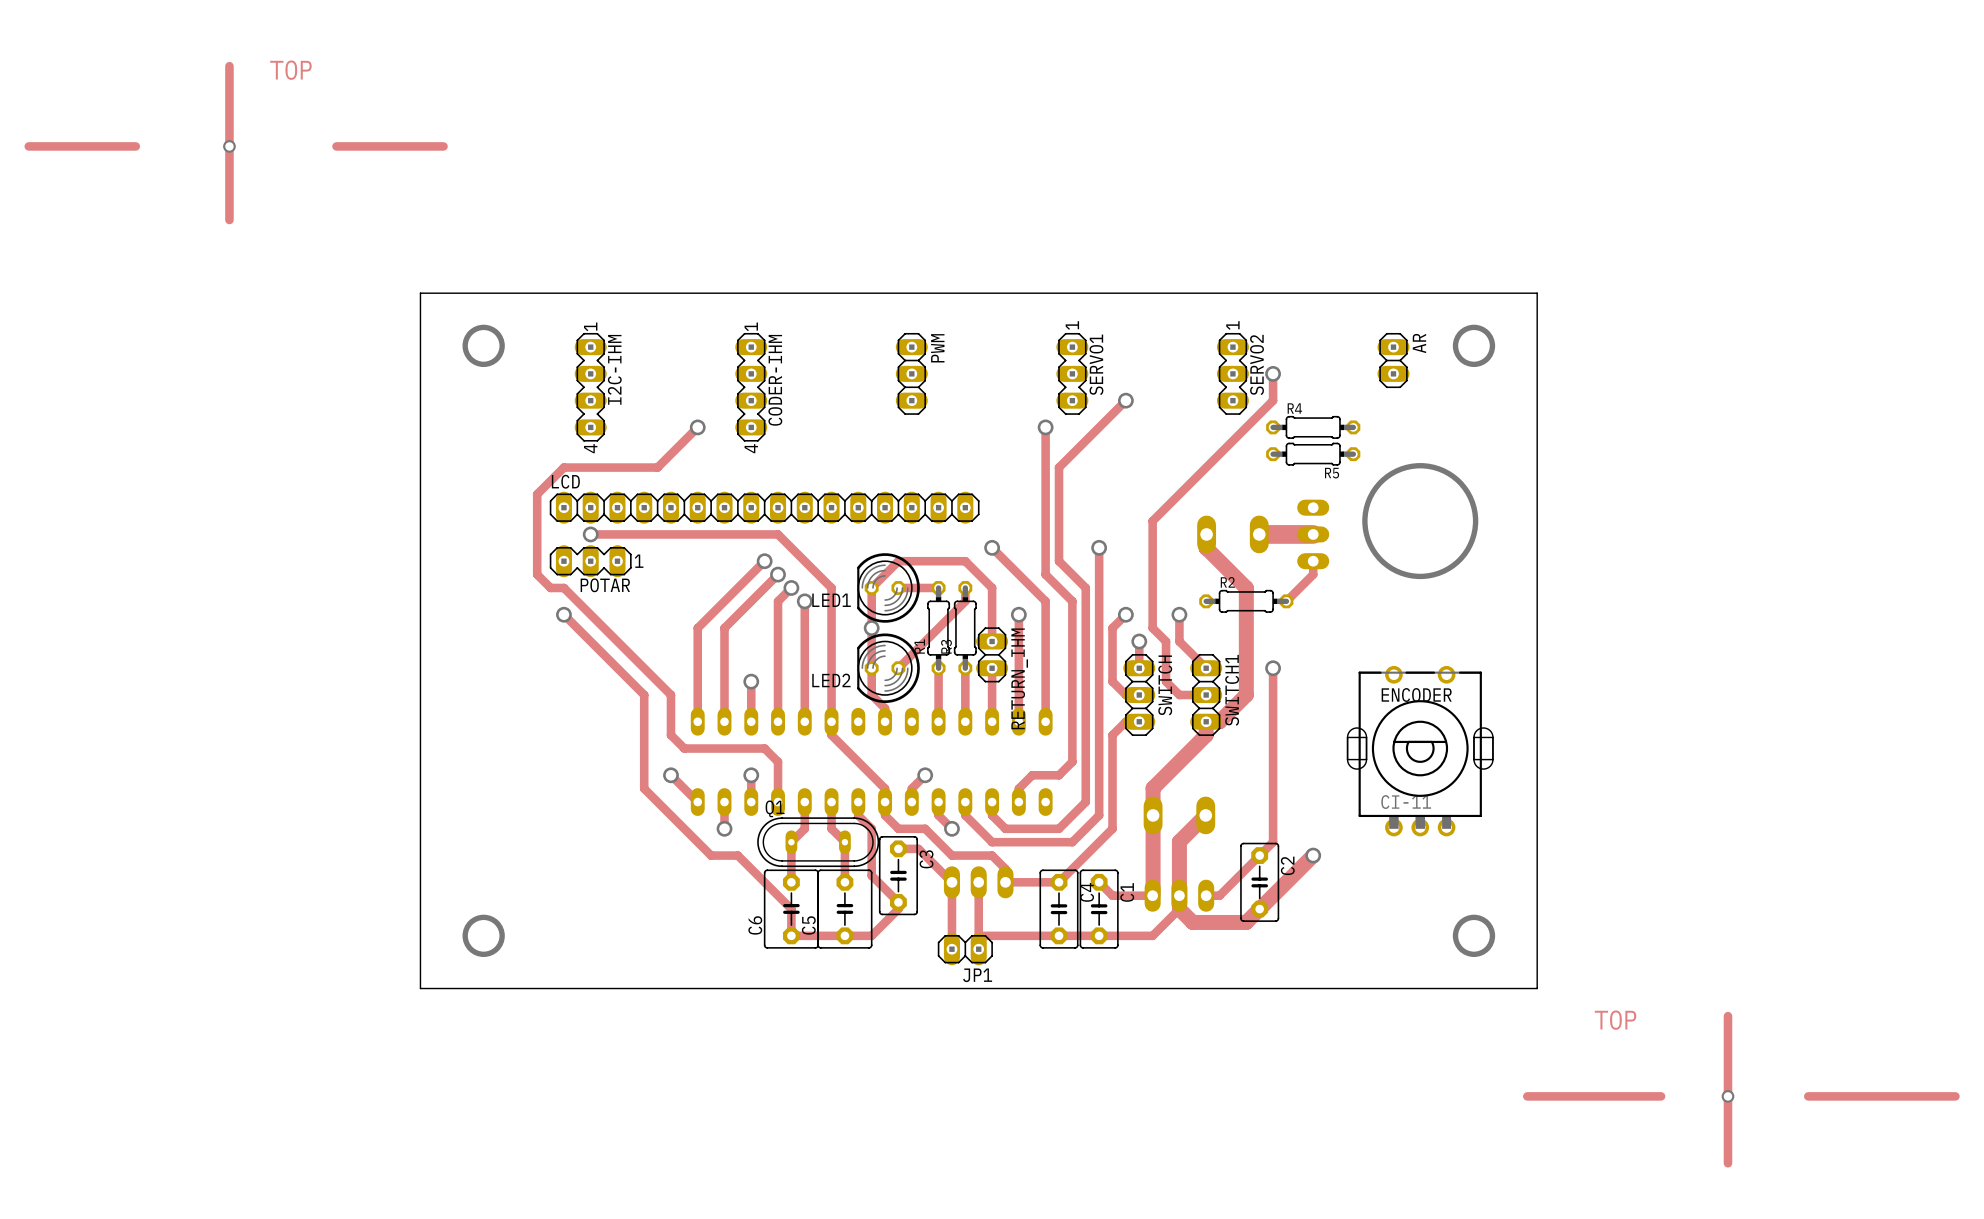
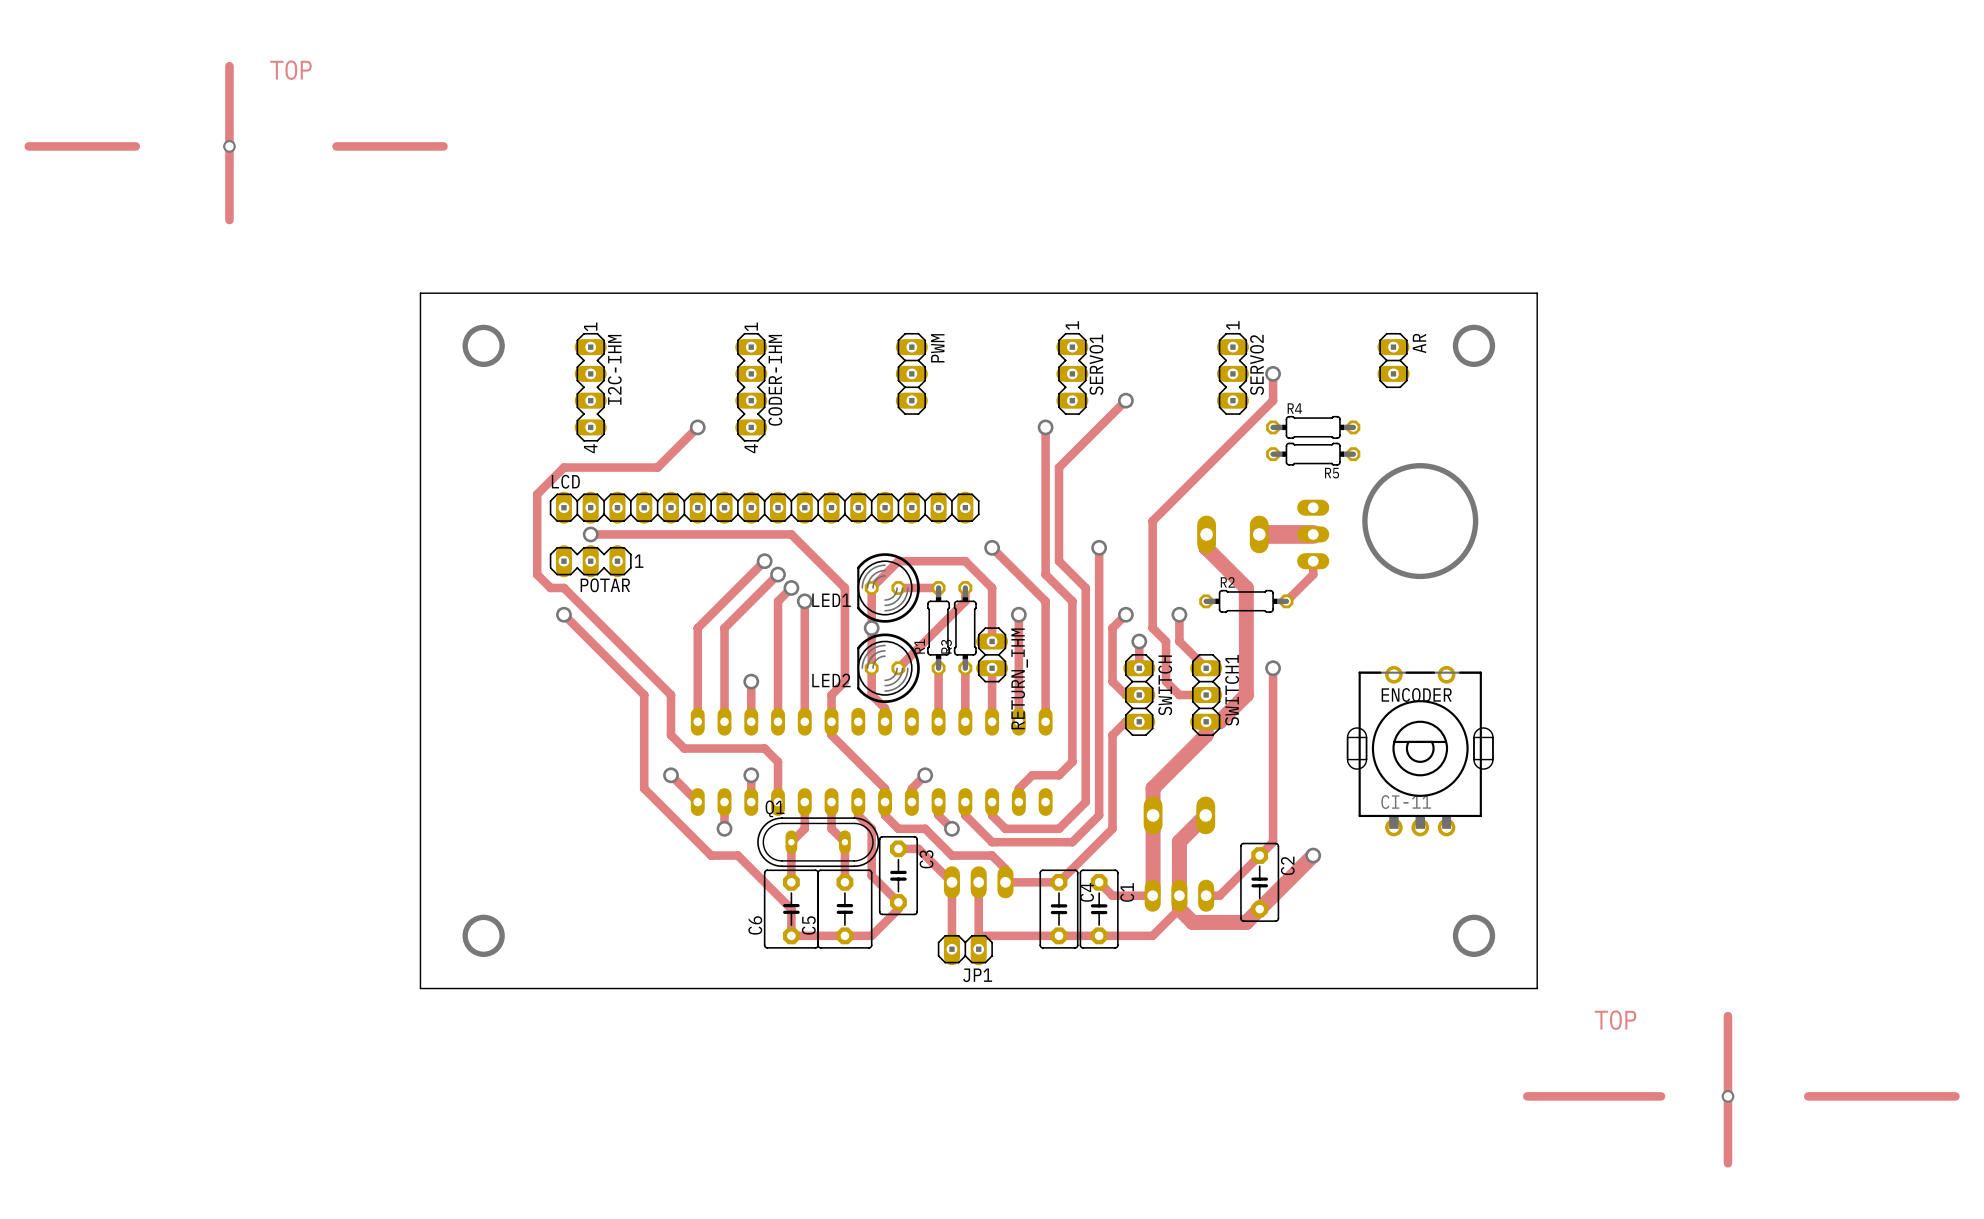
track: (778, 534) (831, 587) (831, 695) -> (778, 534) (791, 534) (844, 587) (844, 681) (831, 695)

